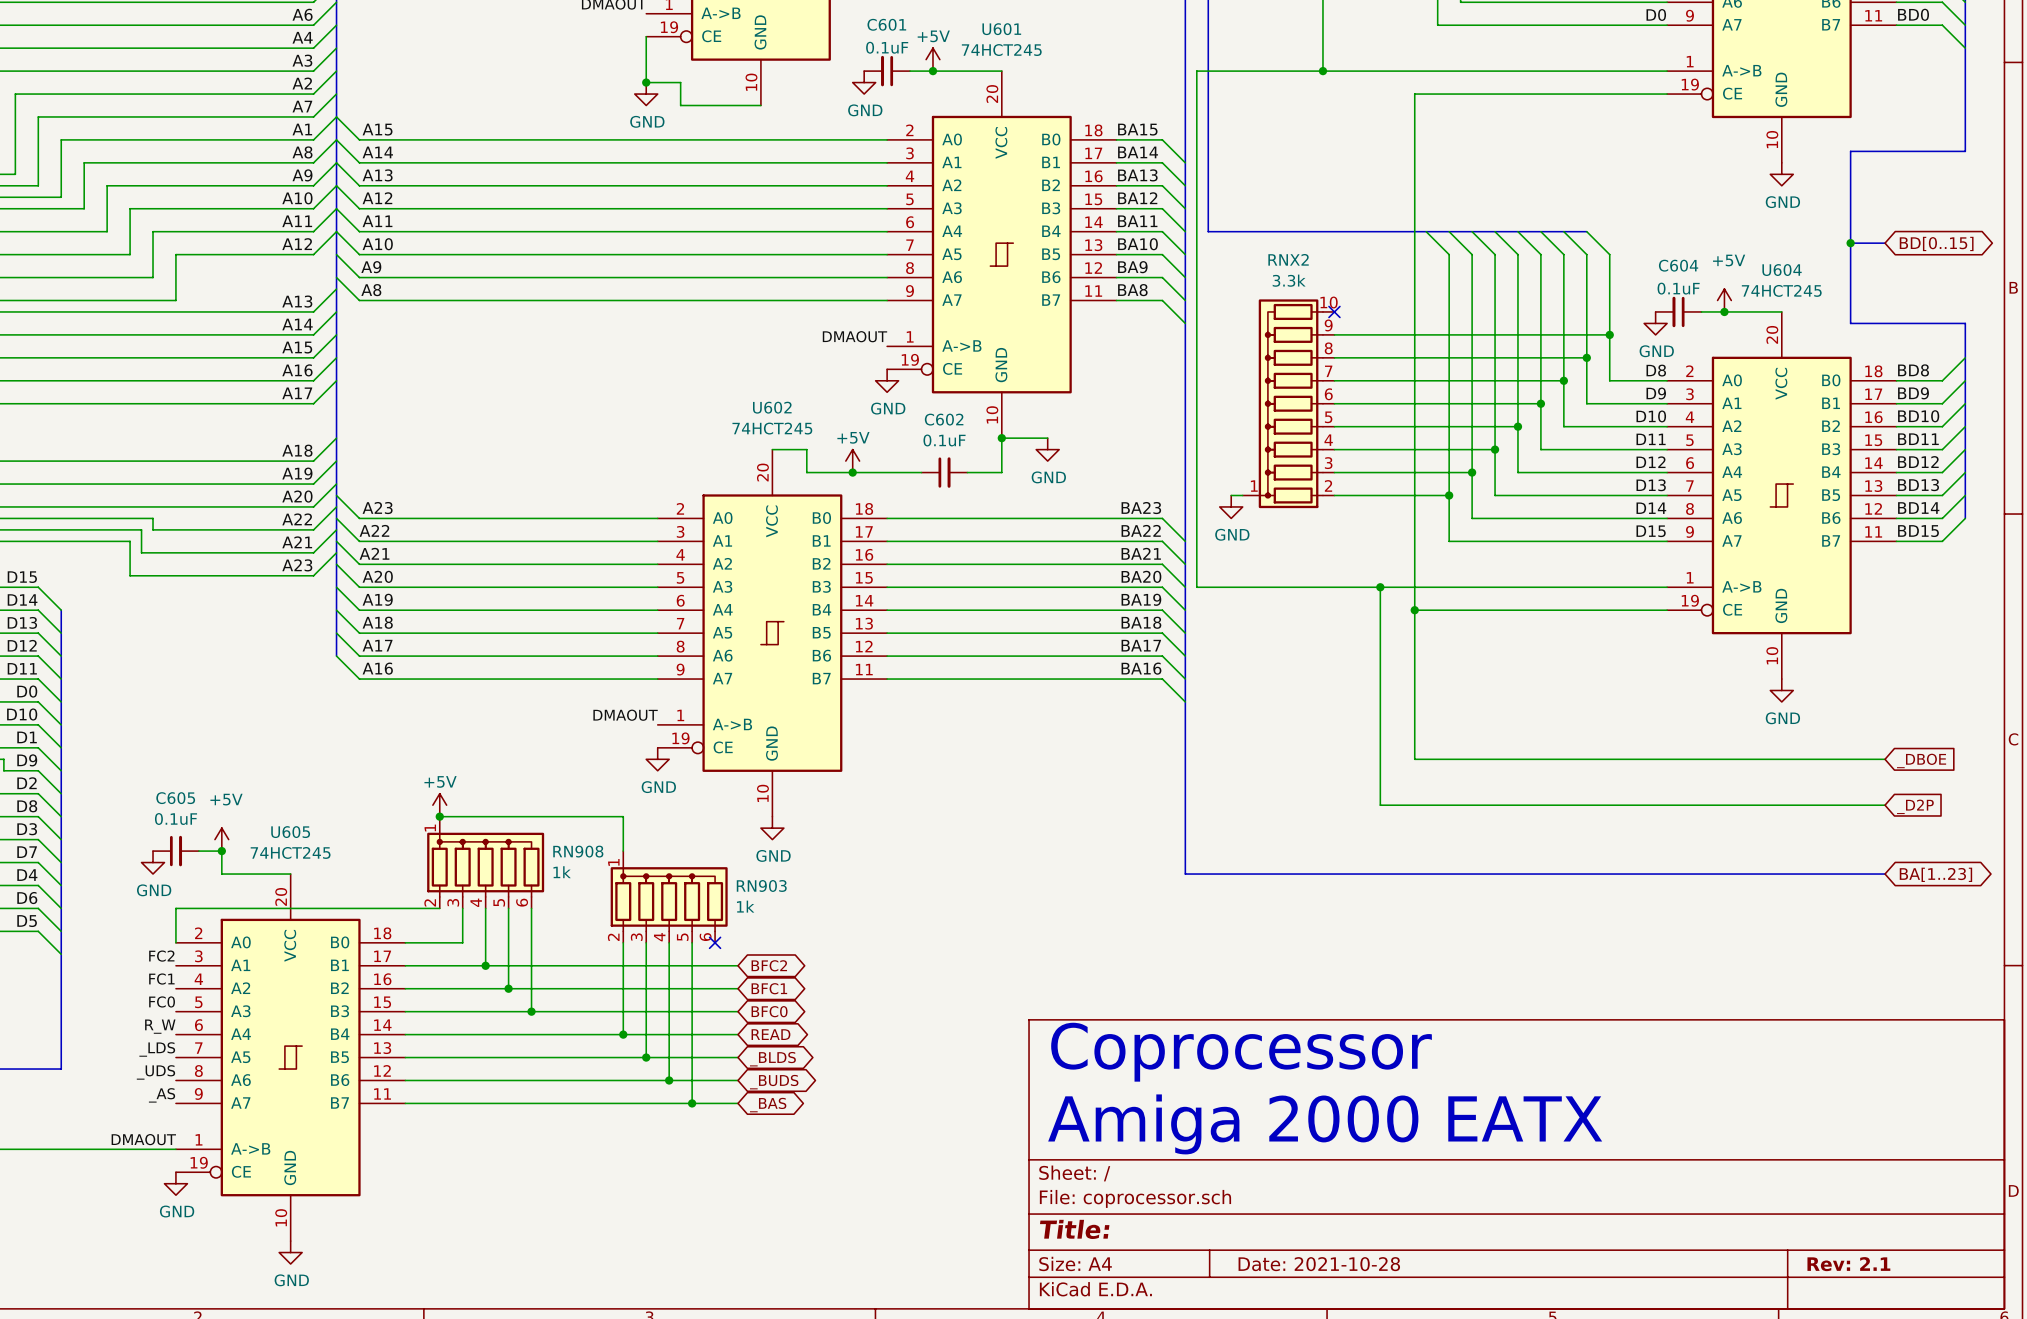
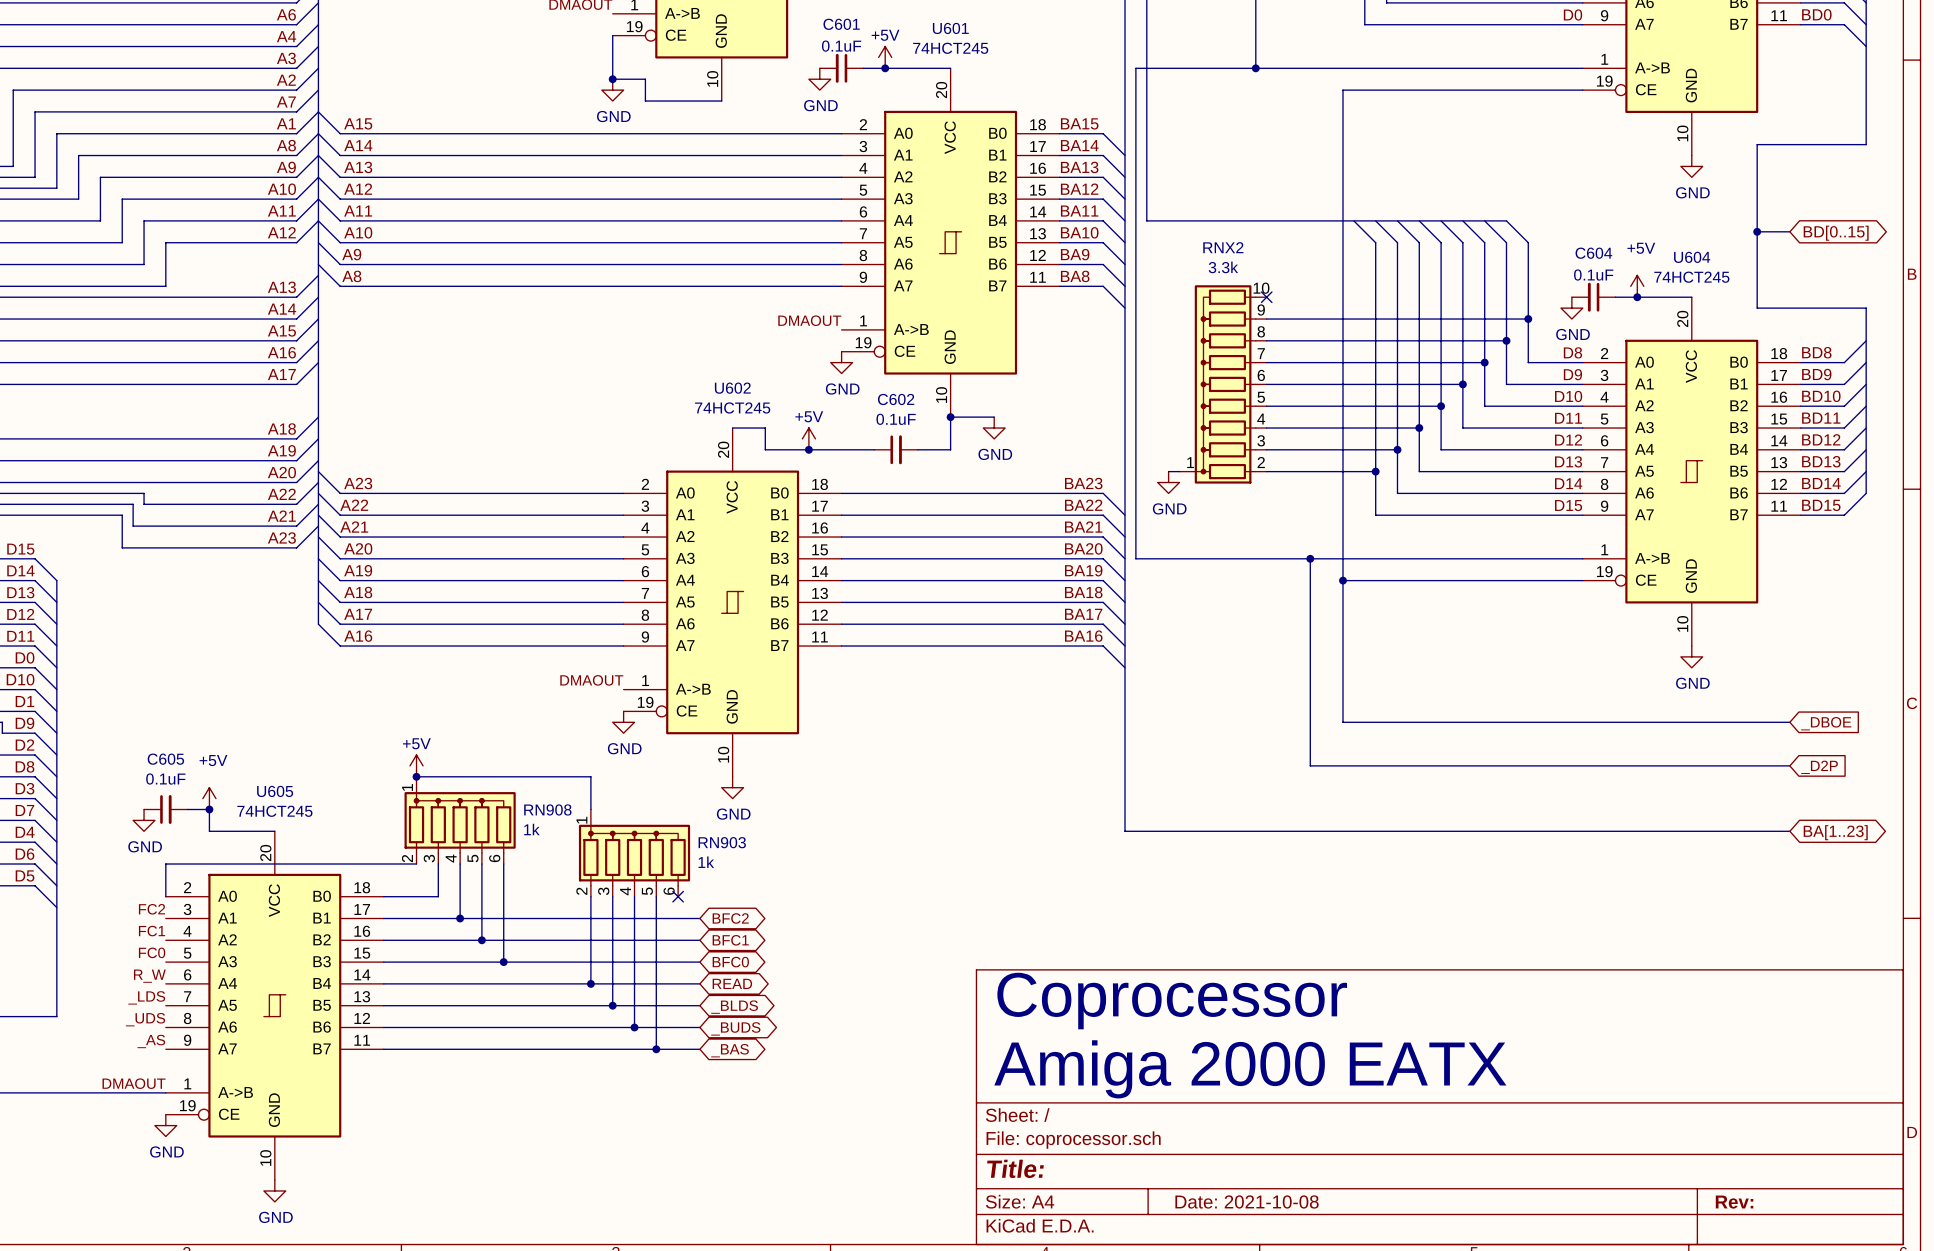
title block: Date: 2021-10-28 (1319, 1264) -> Date: 2021-10-08 (1247, 1201)
title block: Rev: 2.1 (1848, 1264) -> Rev: (1734, 1202)

